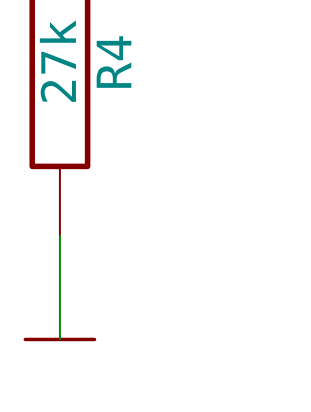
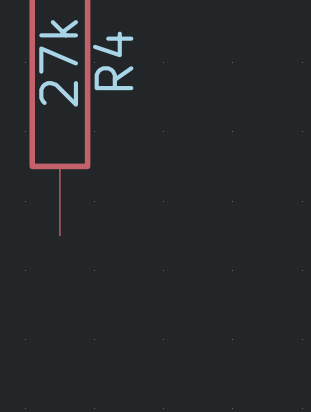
wire: (59, 235) (59, 339) -> none
power symbol: (59, 339) -> none

